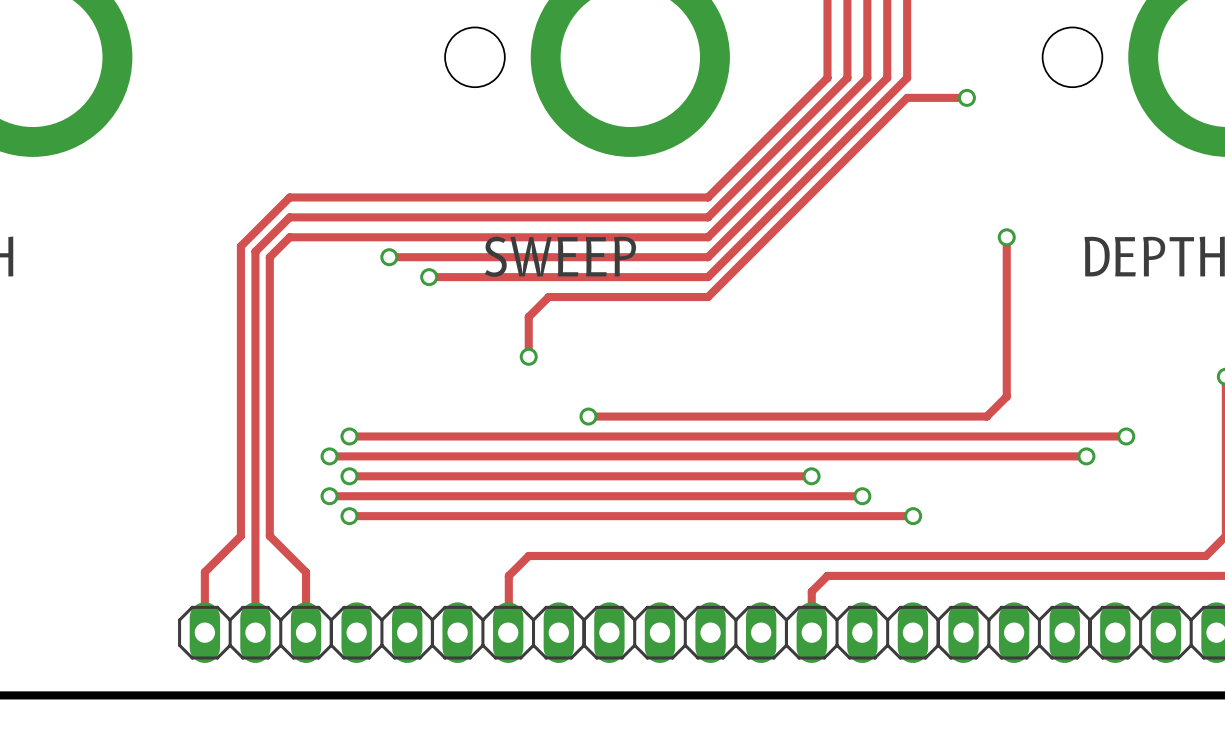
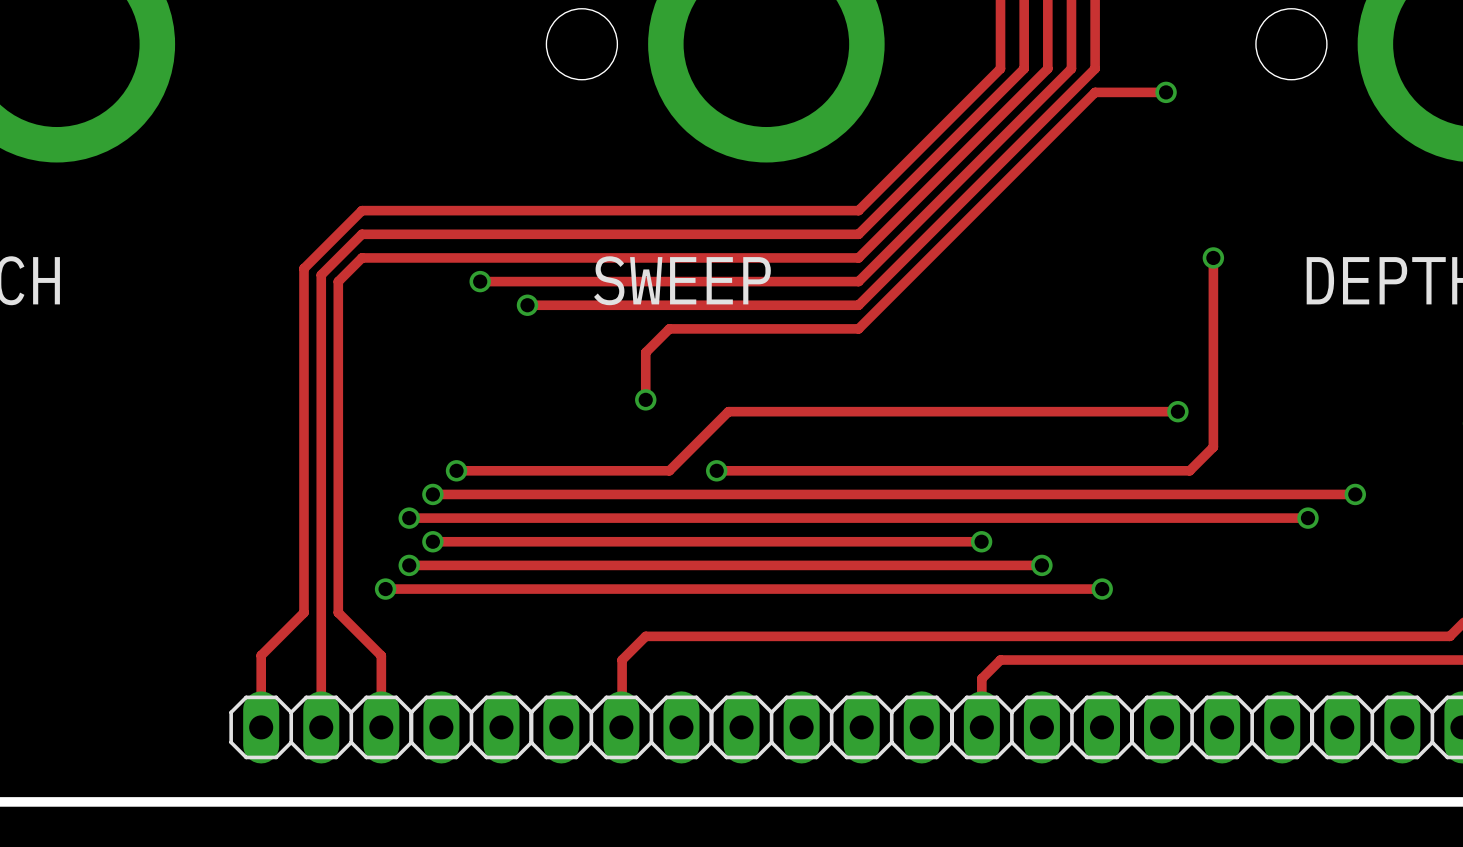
track: none -> (1177, 411) (728, 411) (669, 470) (456, 470)
via: none -> (1177, 411)
via: none -> (456, 470)
track: none -> (385, 589) (432, 589)
via position: (349, 516) -> (385, 589)

